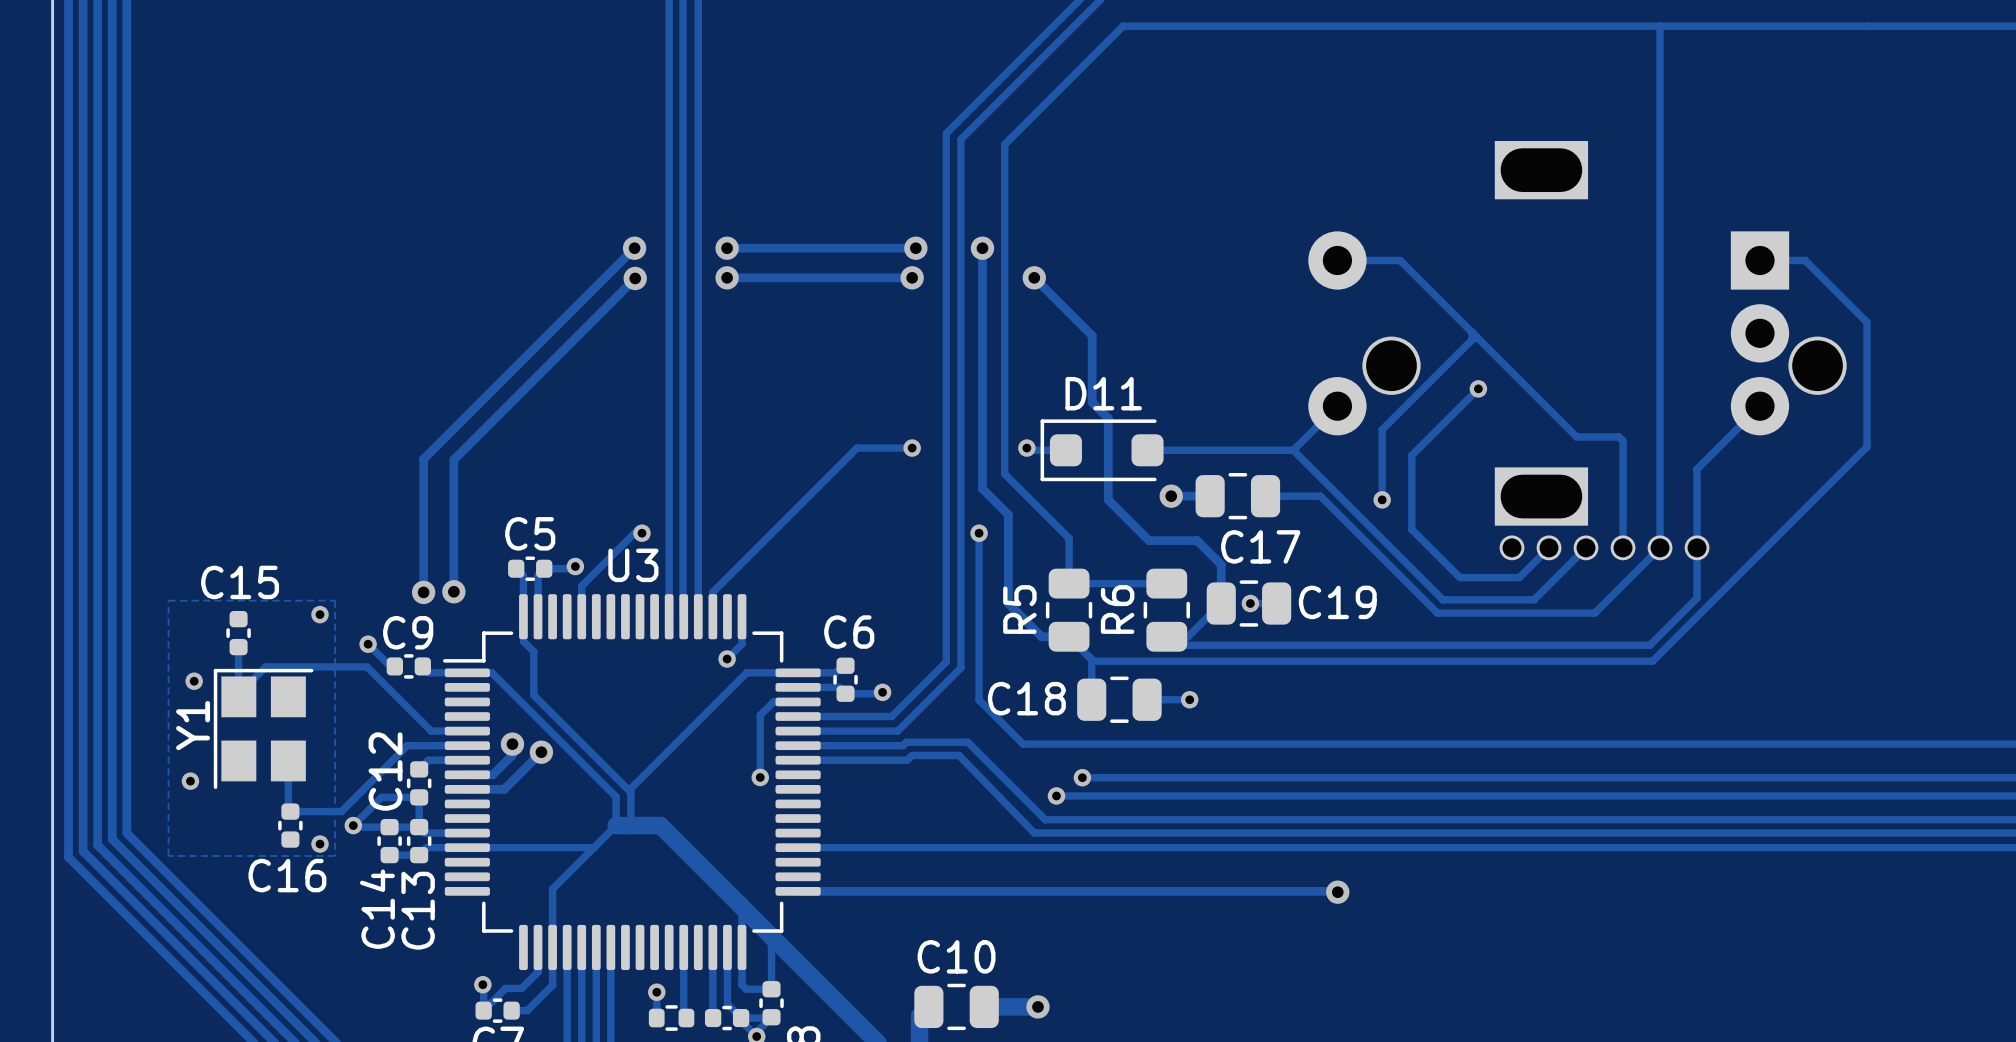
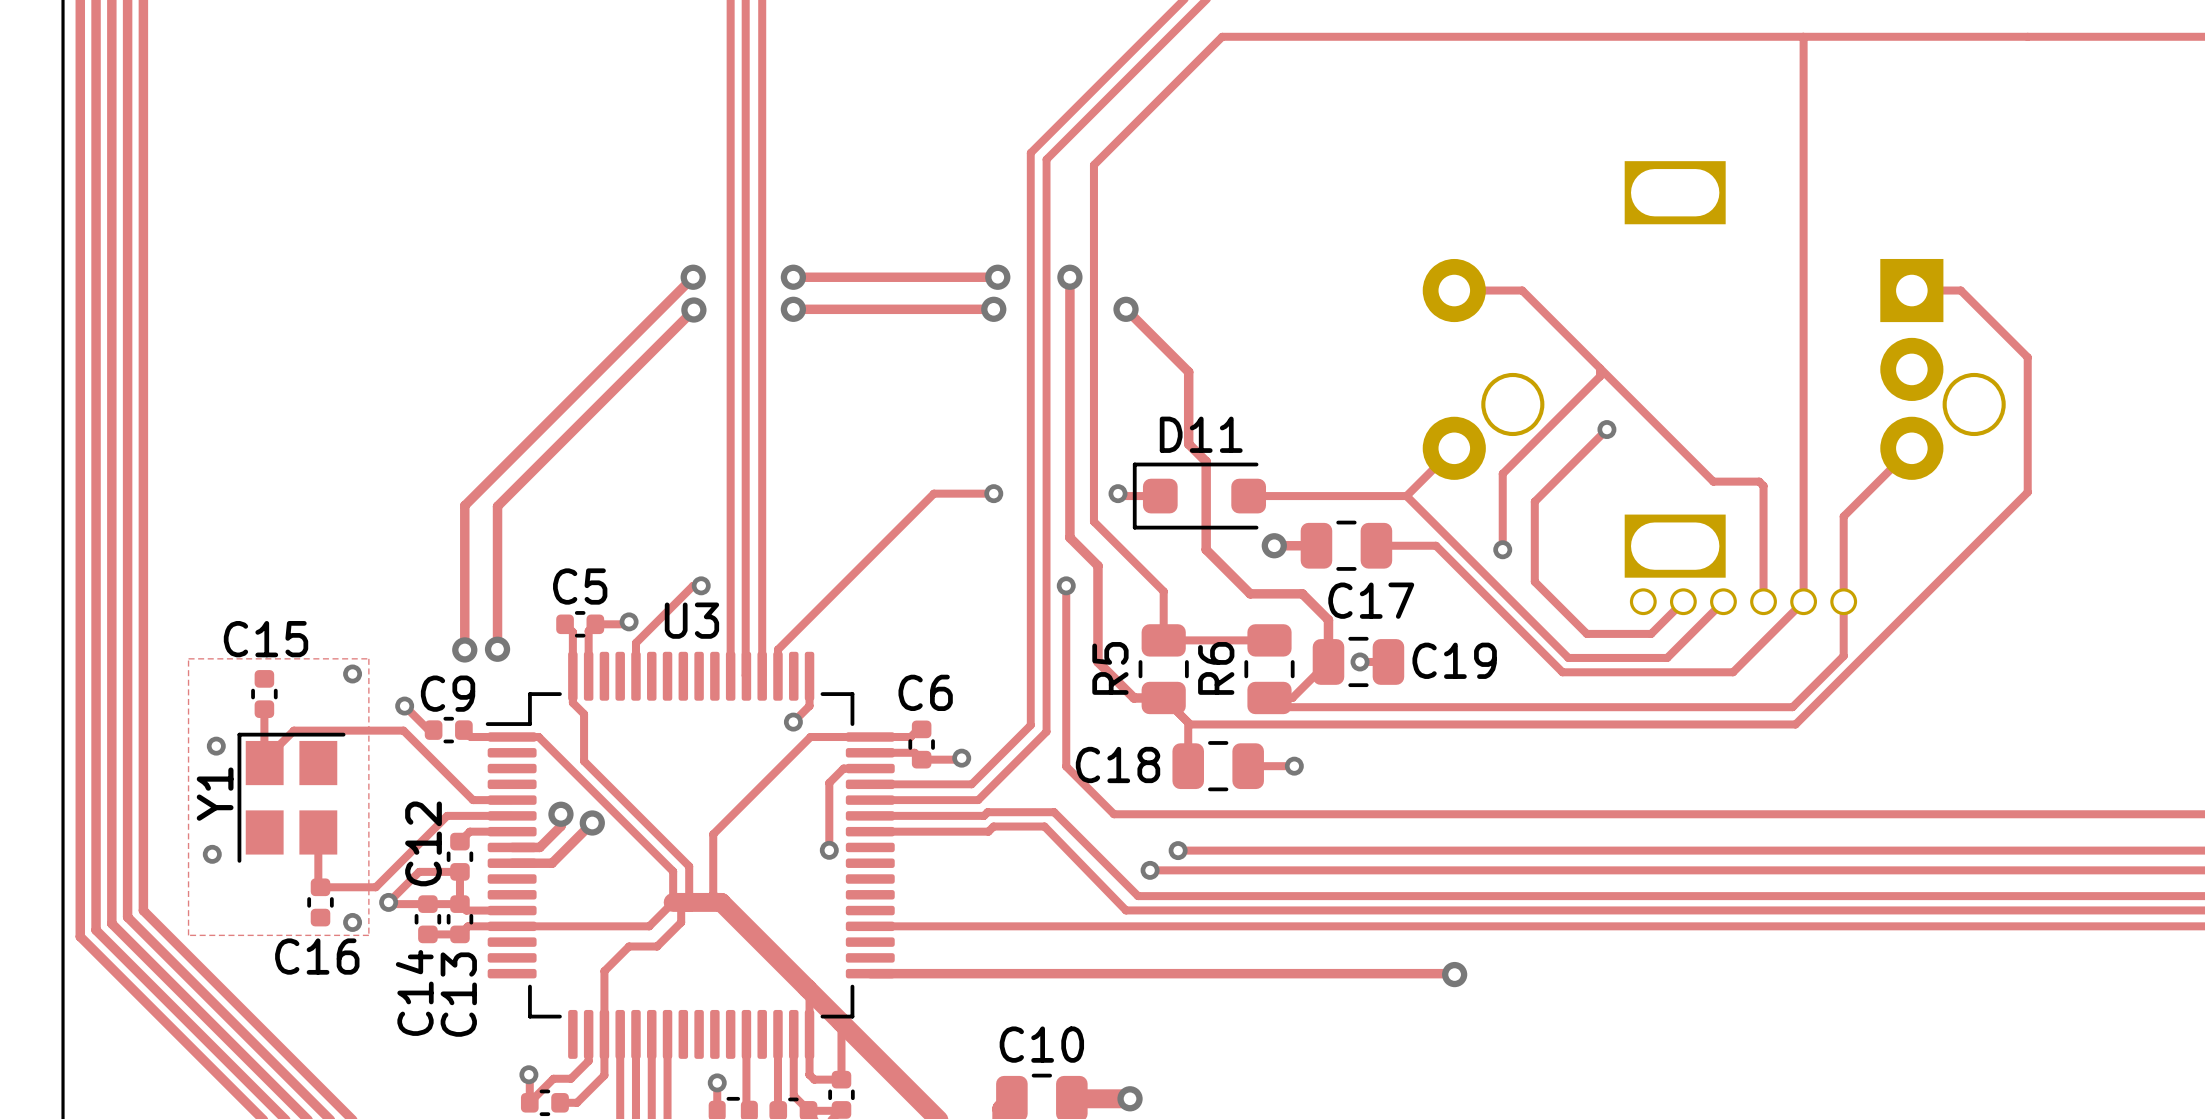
track: (746, 672) (629, 790) -> (814, 737) (810, 737) (713, 834) (713, 894) (721, 902)
track: (593, 847) (575, 866) -> (681, 902) (681, 922) (657, 946) (629, 946)

